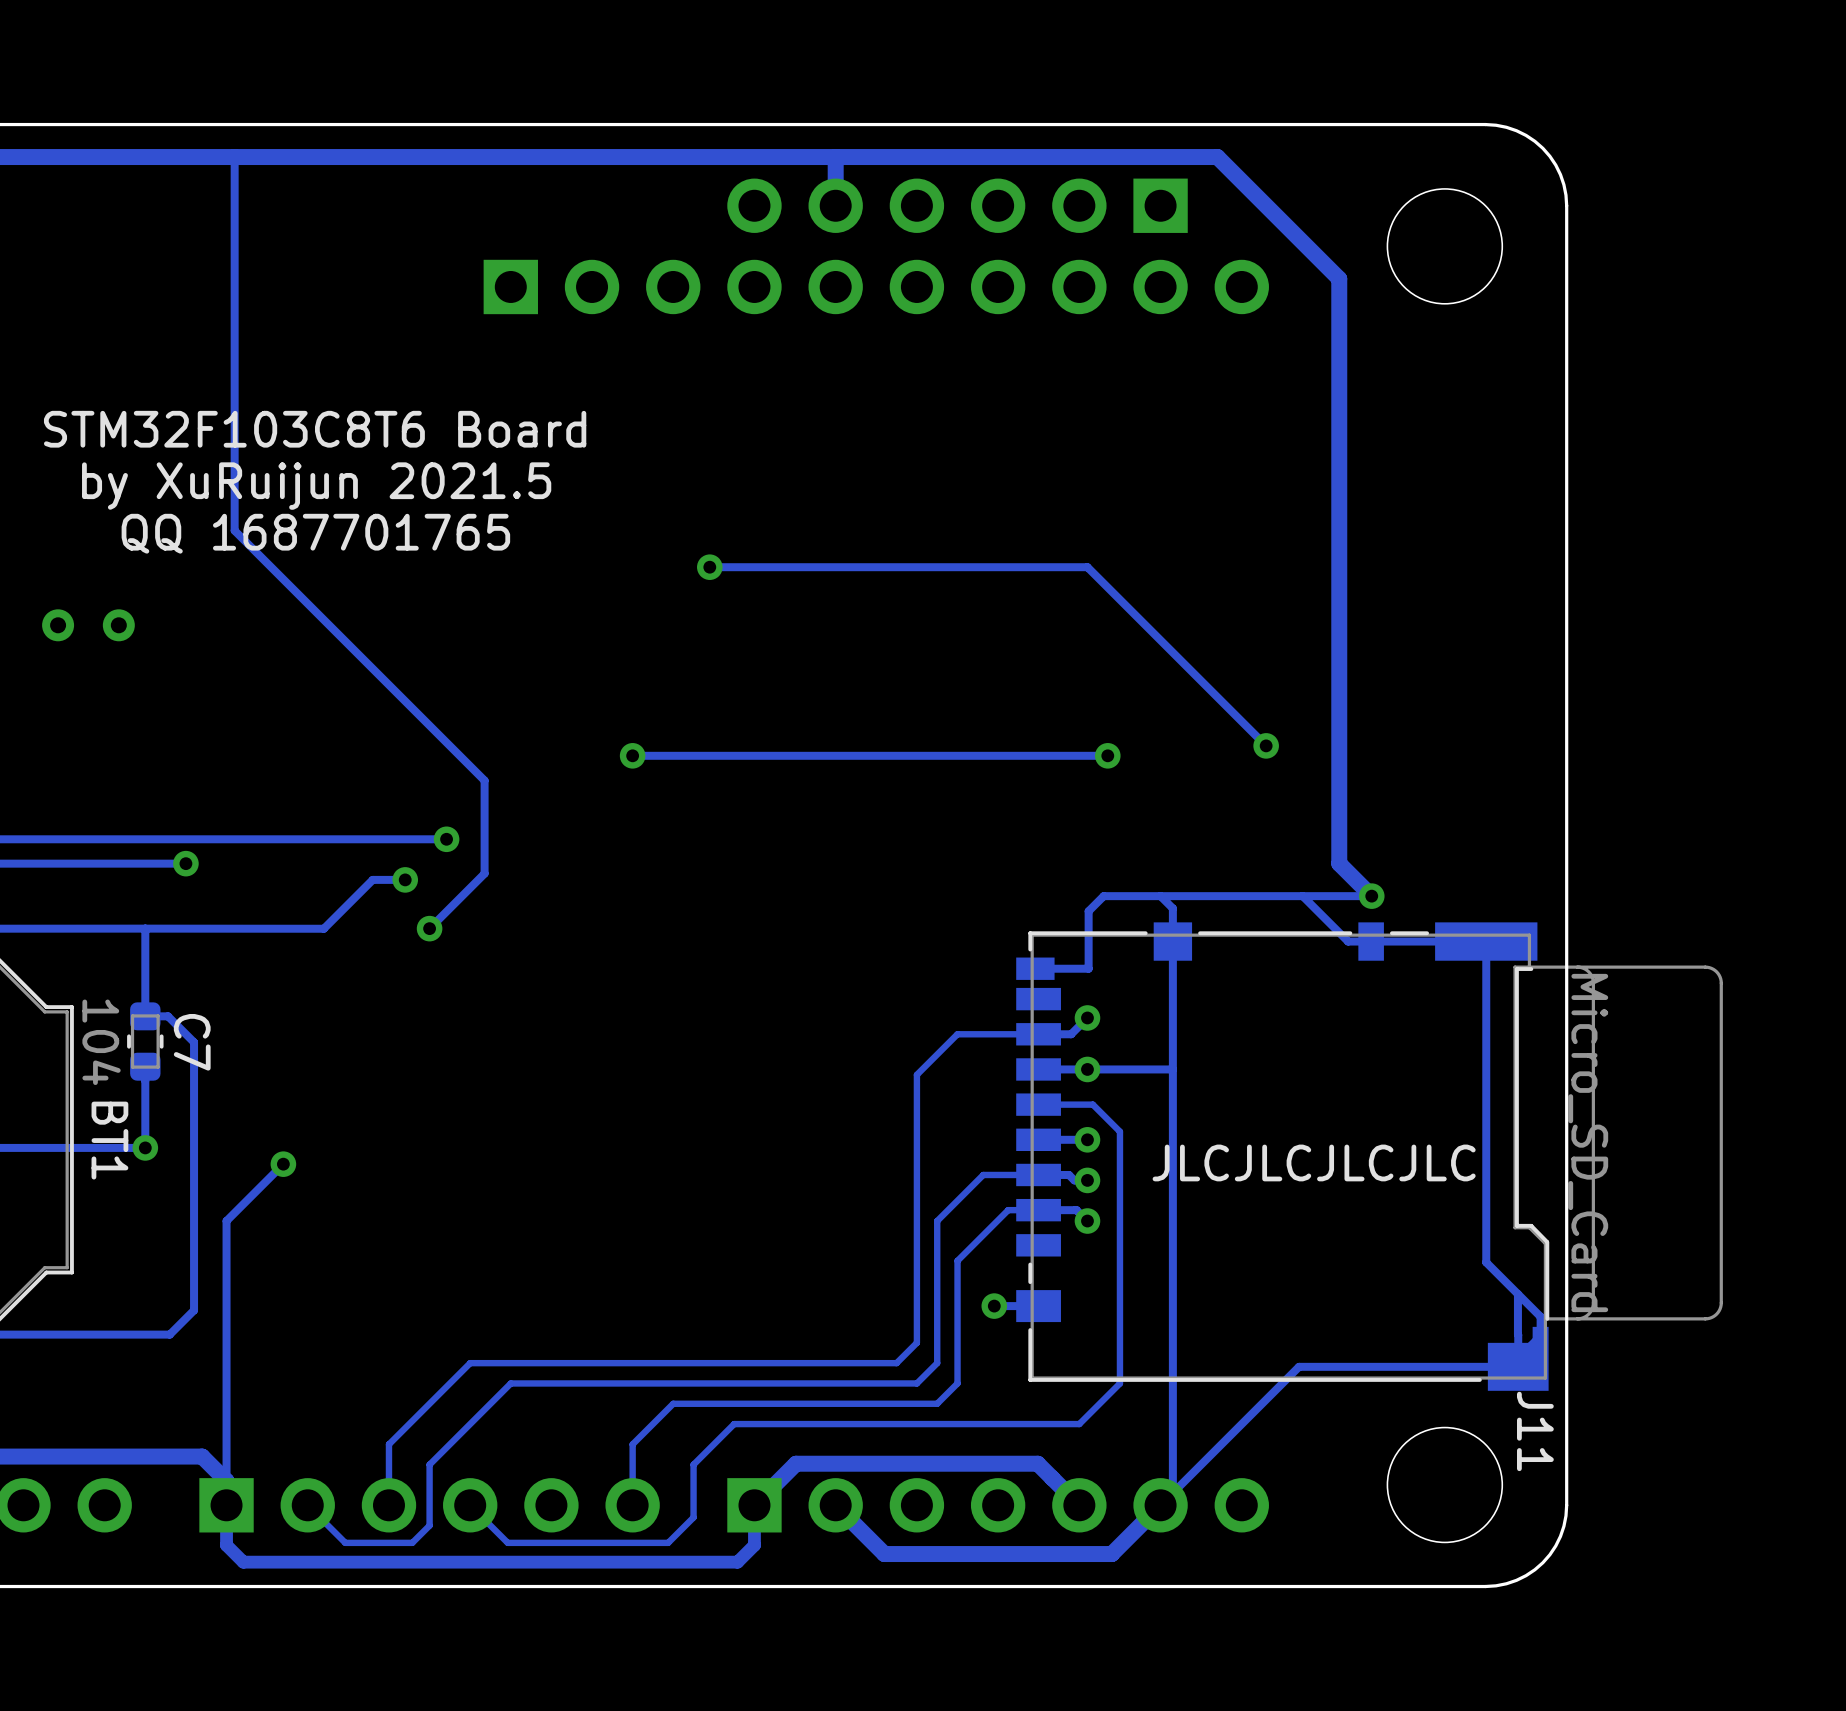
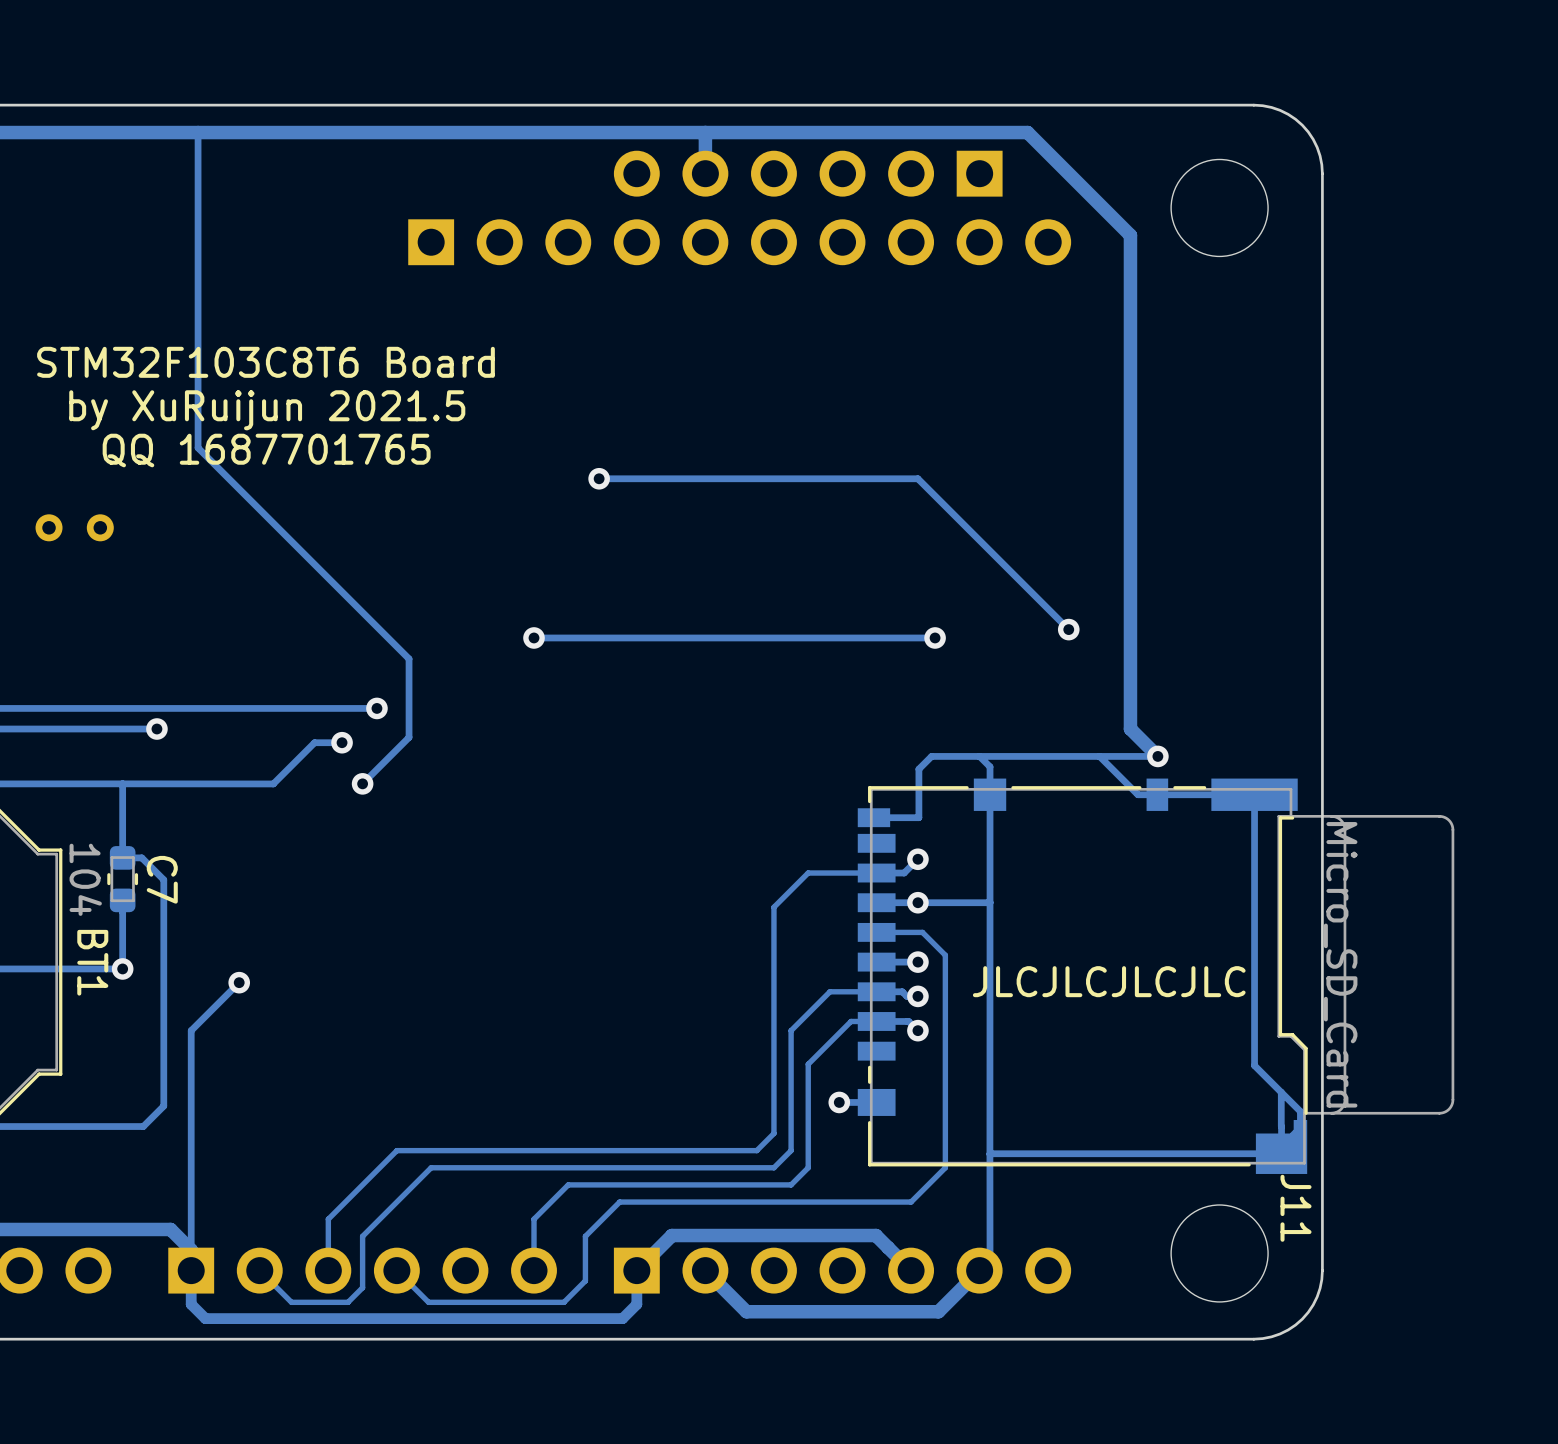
track: (1172, 1069) (1172, 1492) (1299, 1366) -> (990, 902) (990, 1260)
track: none -> (1096, 1153) (990, 1153)

